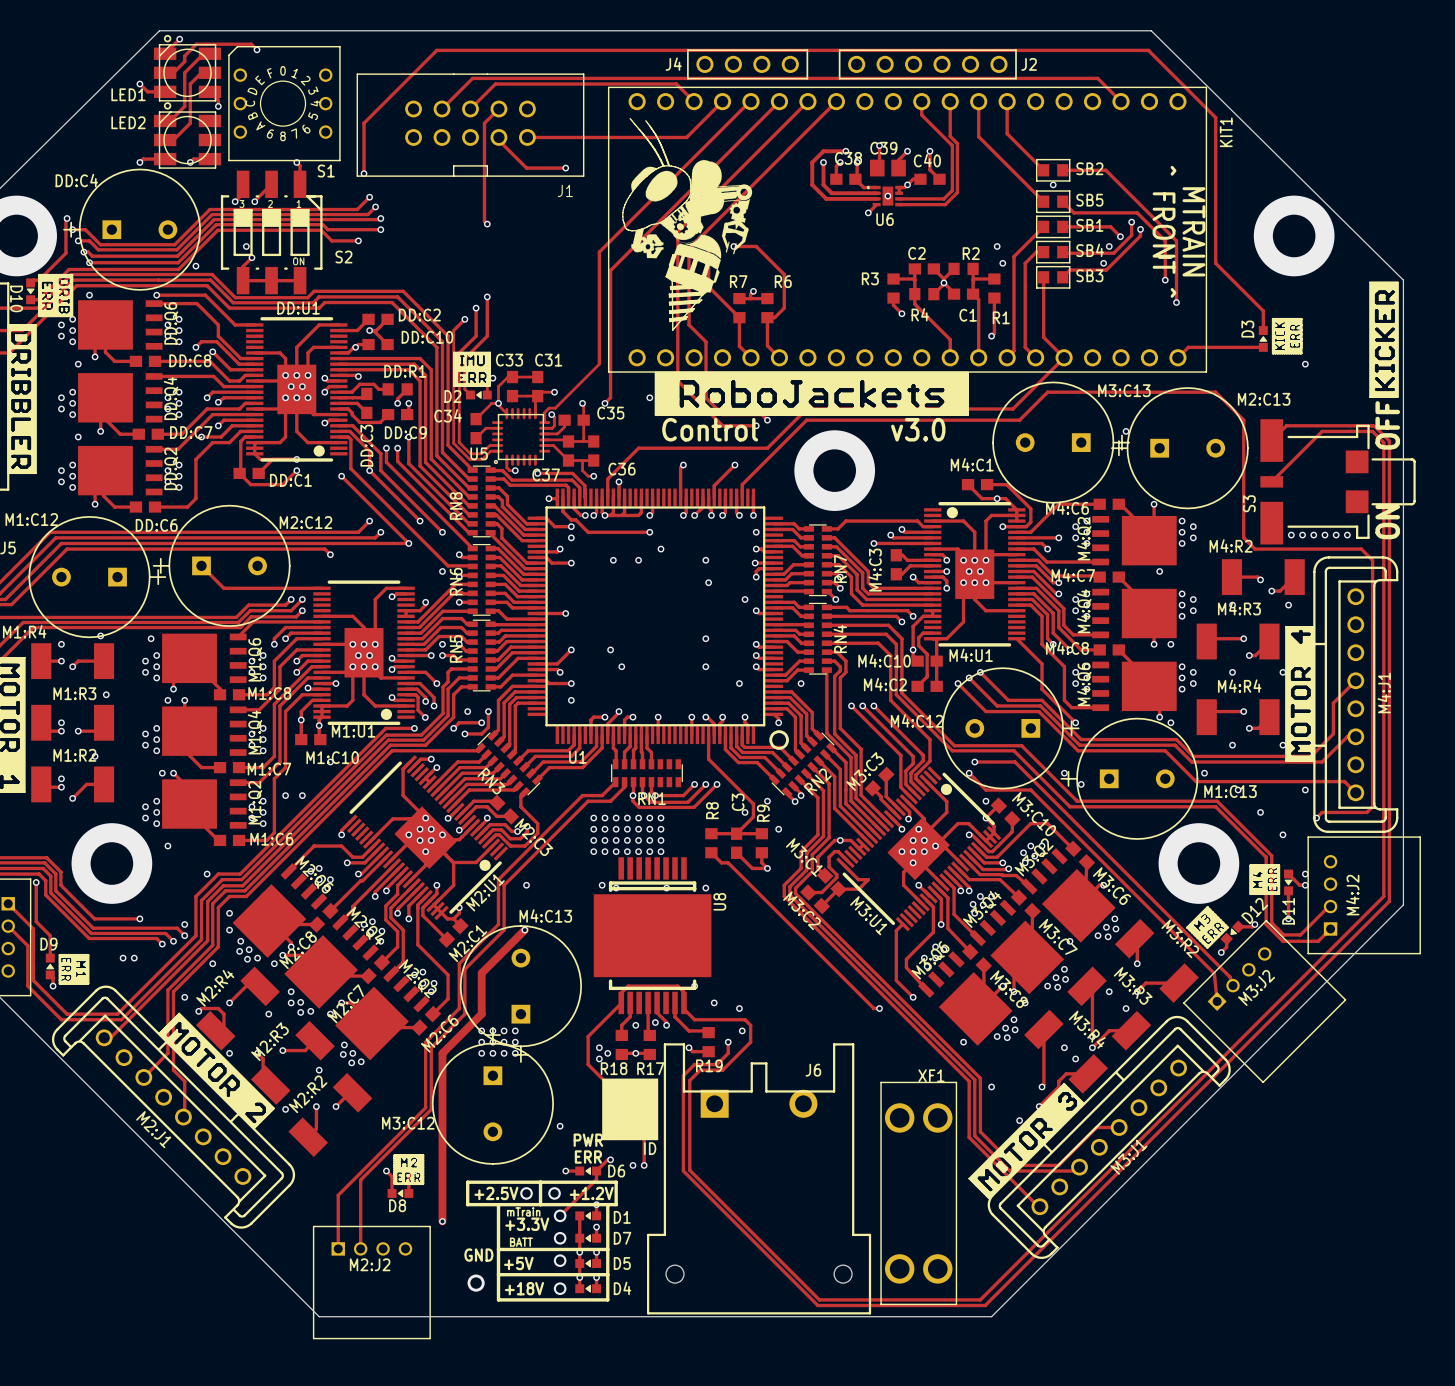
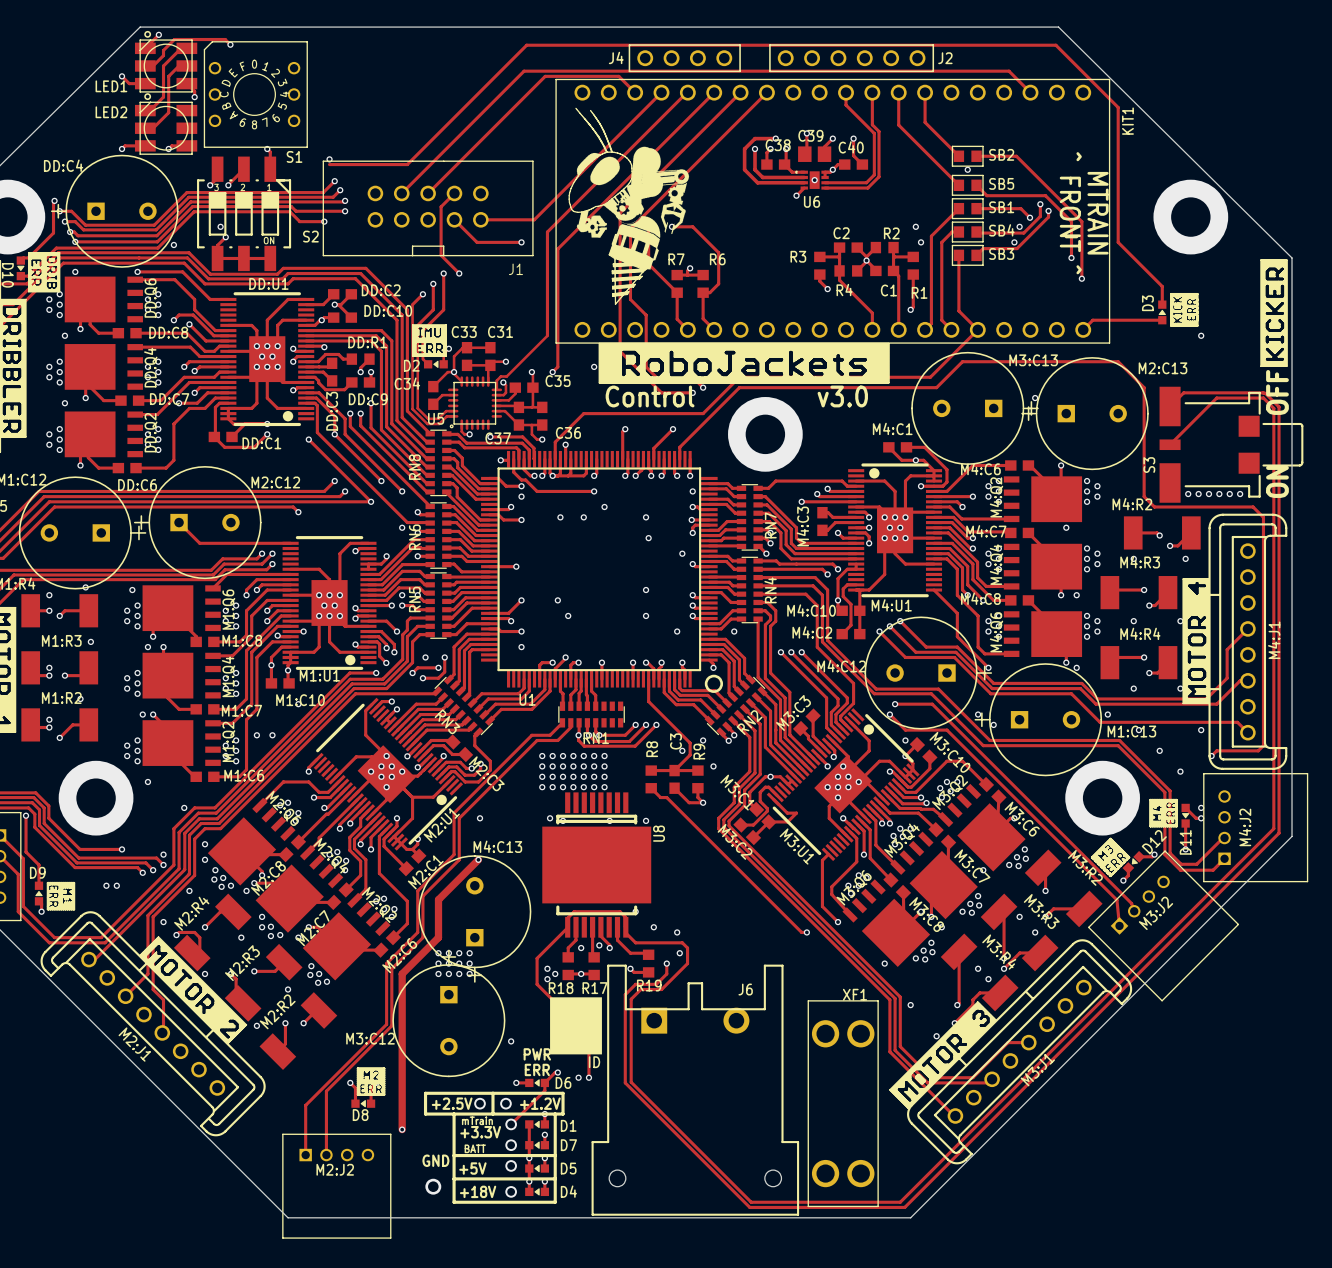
track: (576, 50) (436, 50) (364, 123) (364, 173) -> (526, 45) (407, 164) (329, 164)
track: (574, 78) (472, 78) (442, 109) -> (524, 71) (401, 193)
track: (596, 84) (495, 84) (470, 109) -> (545, 76) (428, 193)
track: (498, 109) (484, 123) (484, 221) (487, 224) -> none
J1 position: (470, 125) -> (428, 208)
track: (498, 137) (498, 140) (526, 168) (565, 168) -> none
track: (527, 137) (686, 137) -> (480, 219) (534, 219) (628, 125)
via: (565, 168) -> none
track: none -> (454, 193) (441, 206) (441, 255) (459, 273)
via: (487, 224) -> none
track: none -> (454, 219) (477, 242) (521, 242)
via: none -> (521, 242)
via: none -> (459, 273)

